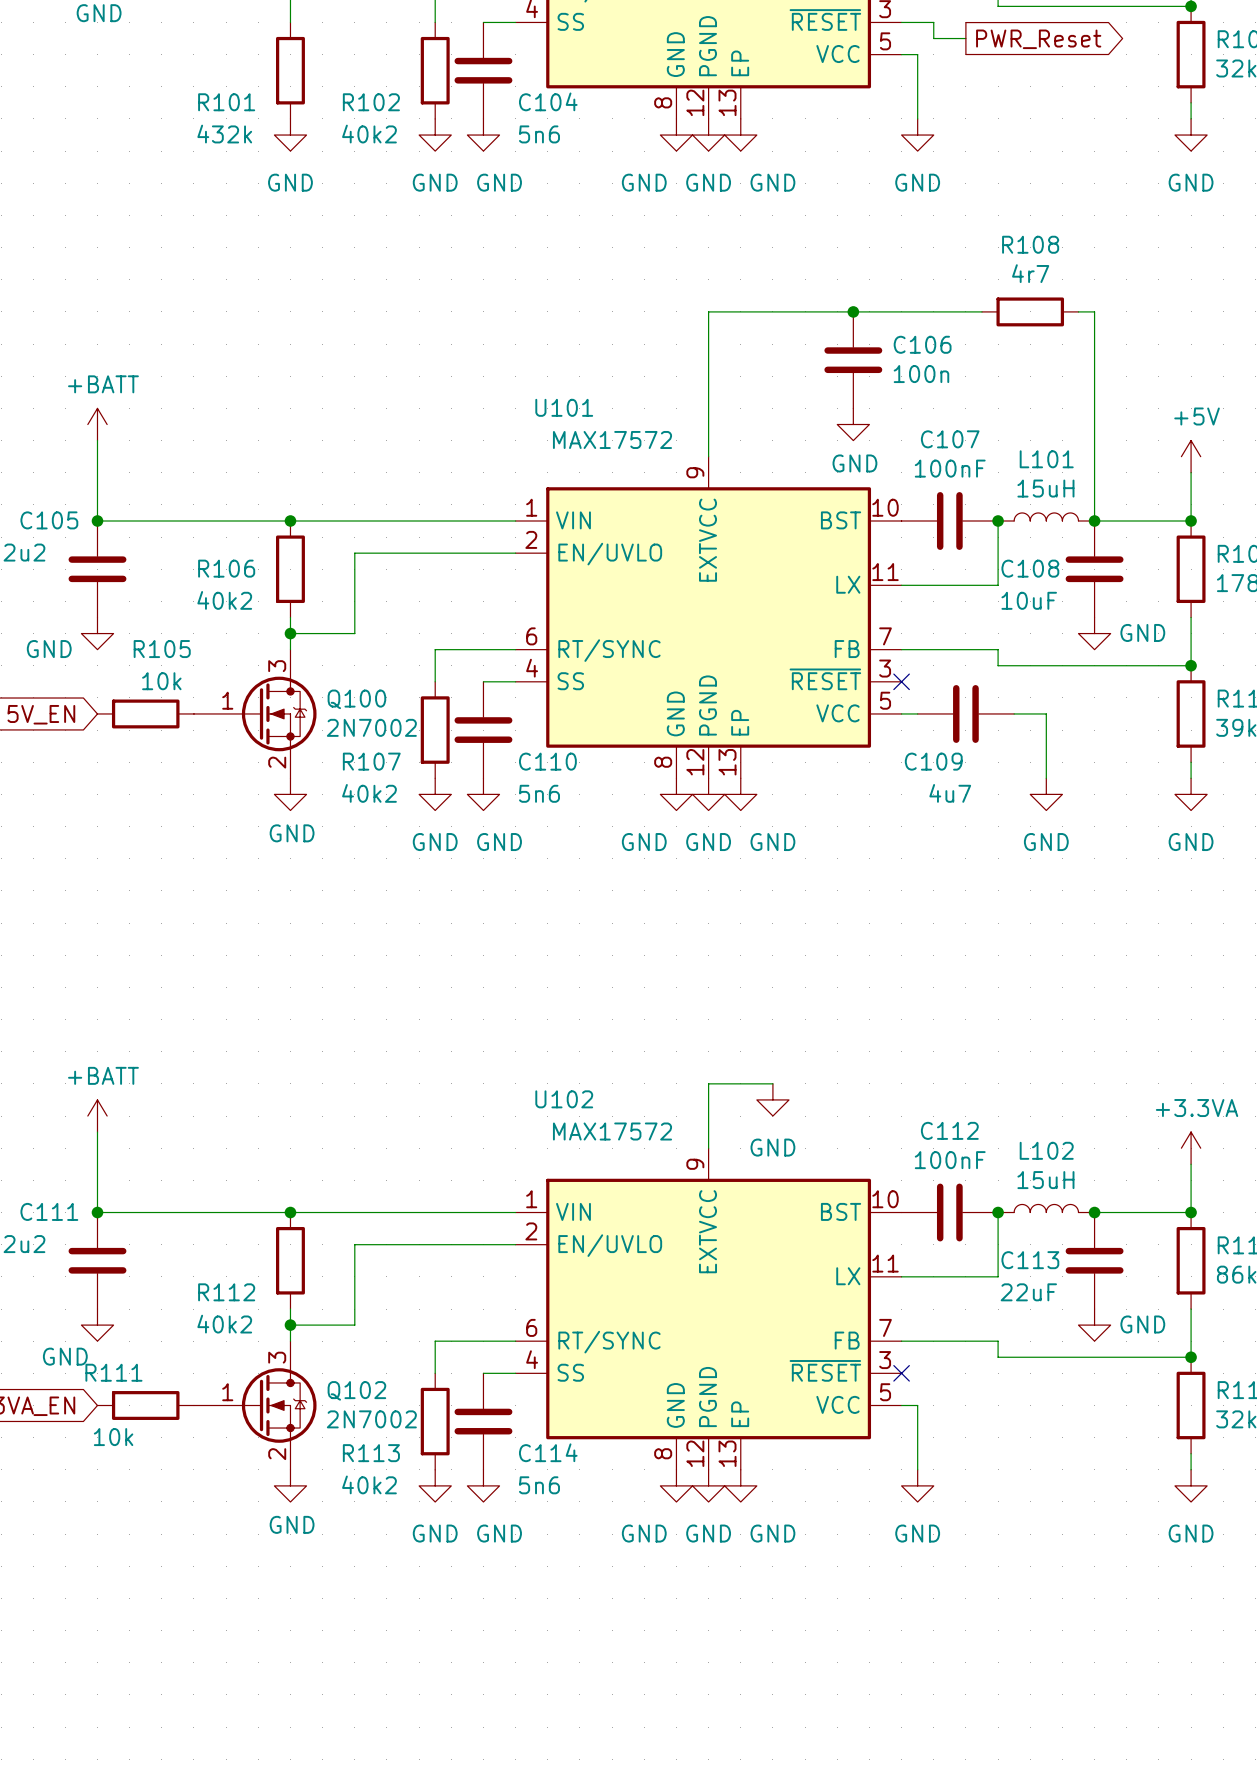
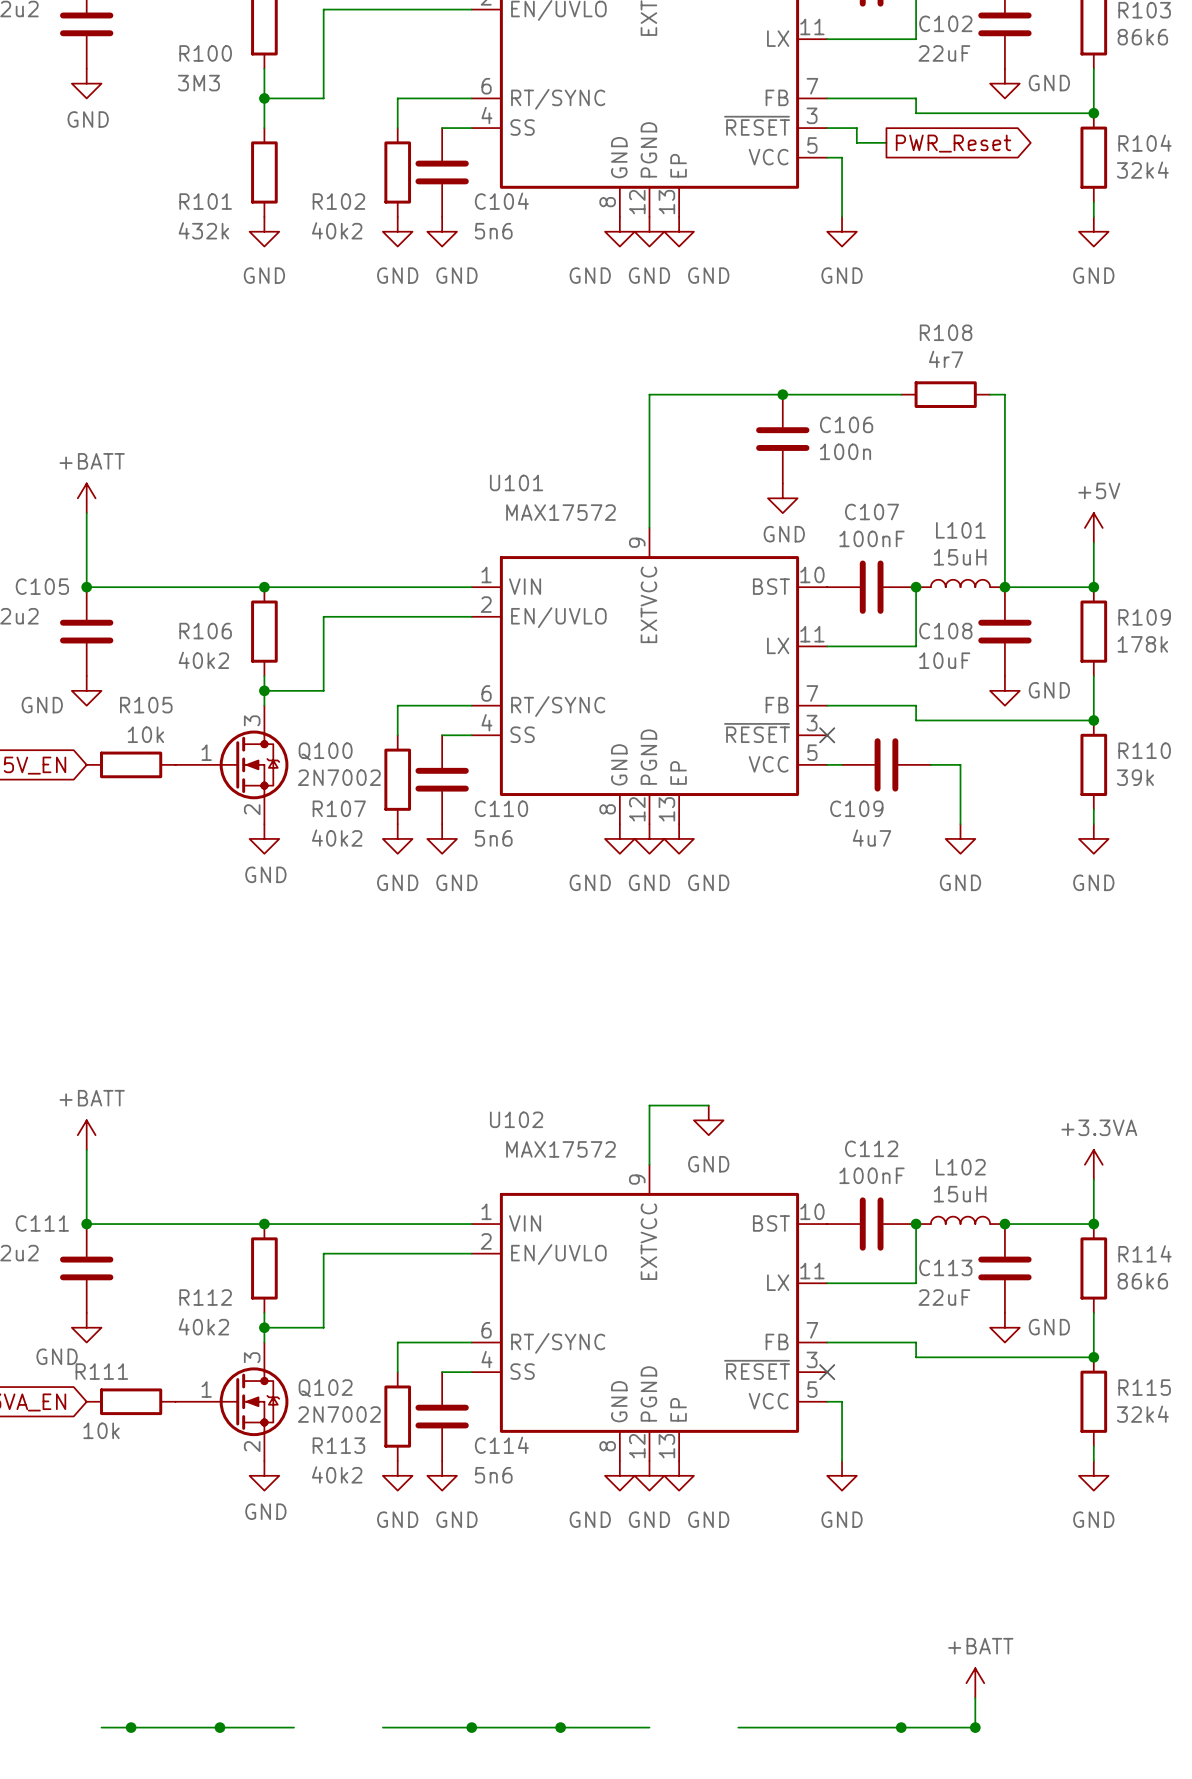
power symbol: none -> +BATT (975, 1683)
wire: none -> (975, 1697) (975, 1727) (738, 1727)
wire: none -> (101, 1727) (294, 1727)
junction: none -> (131, 1727)
junction: none -> (219, 1727)
wire: none -> (382, 1727) (649, 1727)
junction: none -> (471, 1727)
junction: none -> (560, 1727)
junction: none -> (901, 1727)
junction: none -> (975, 1727)

